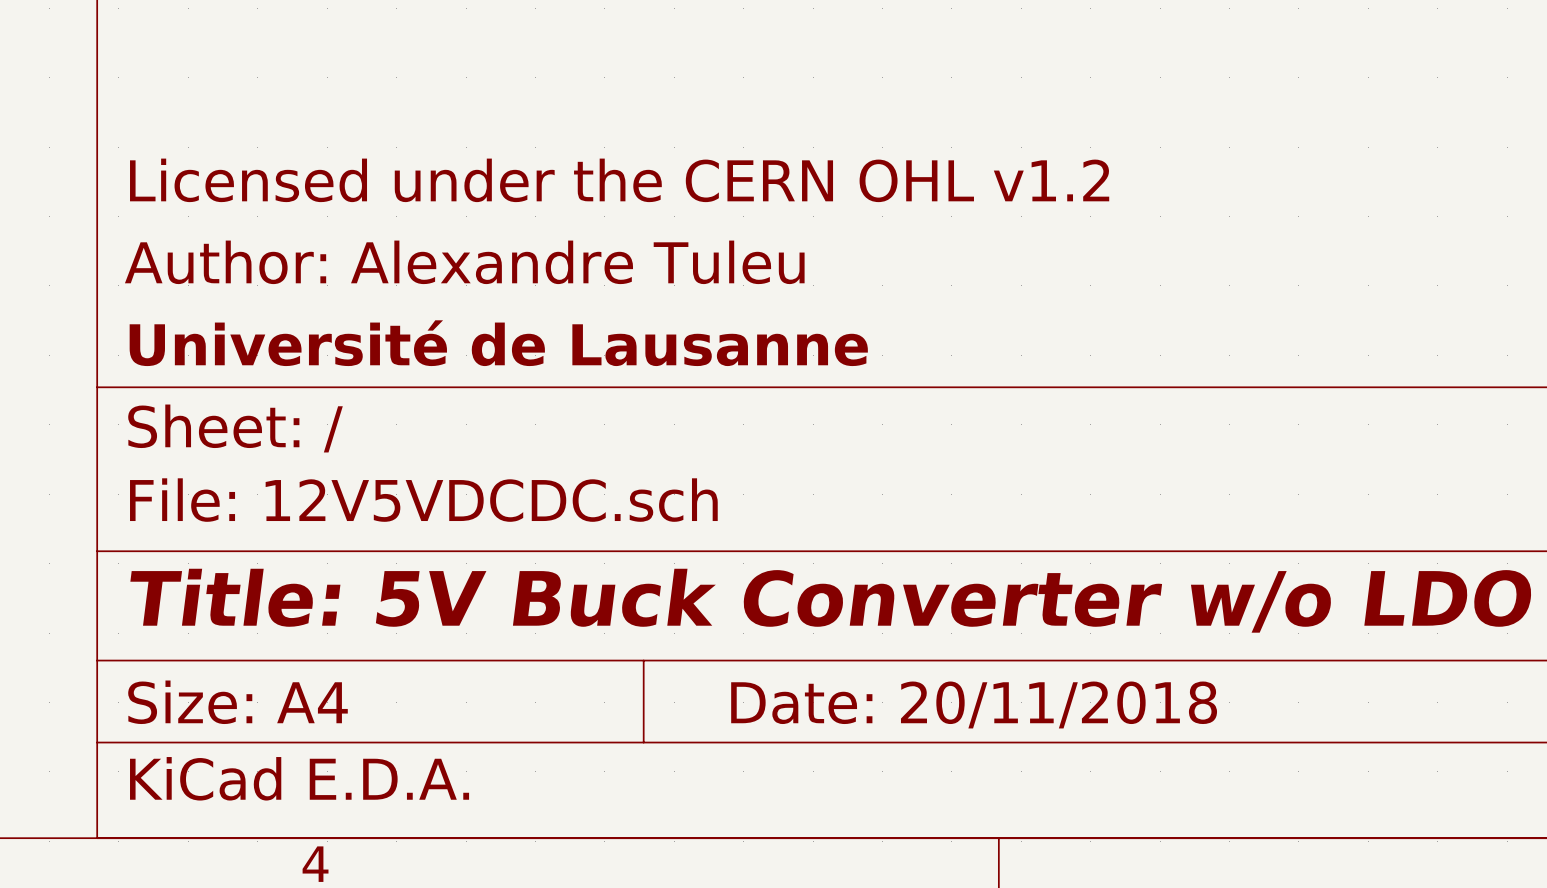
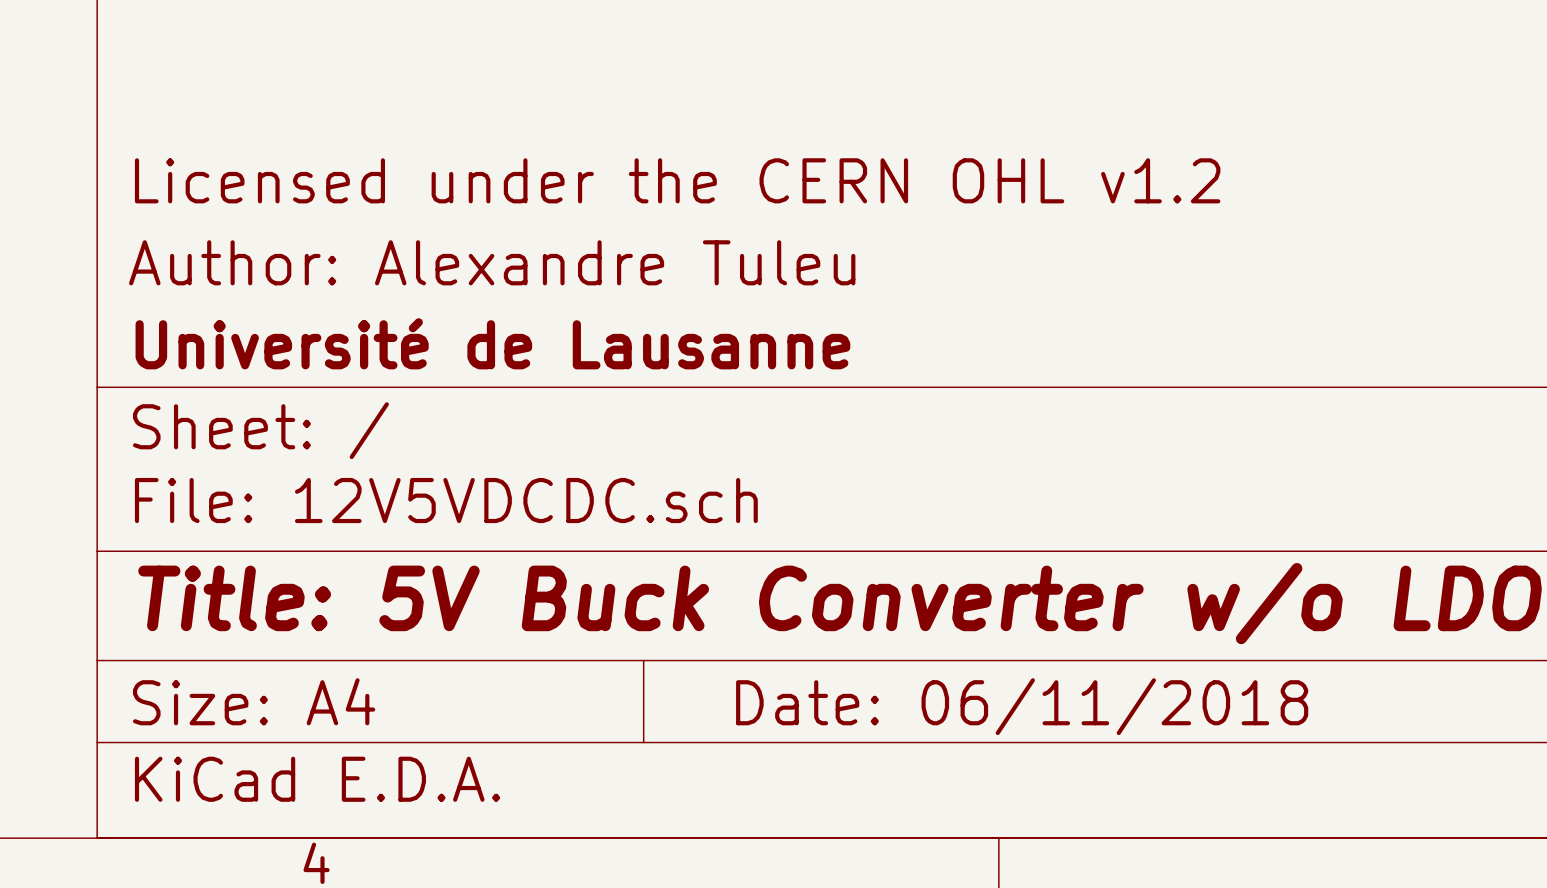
title block: Date: 20/11/2018 (974, 704) -> Date: 06/11/2018 (1022, 706)

